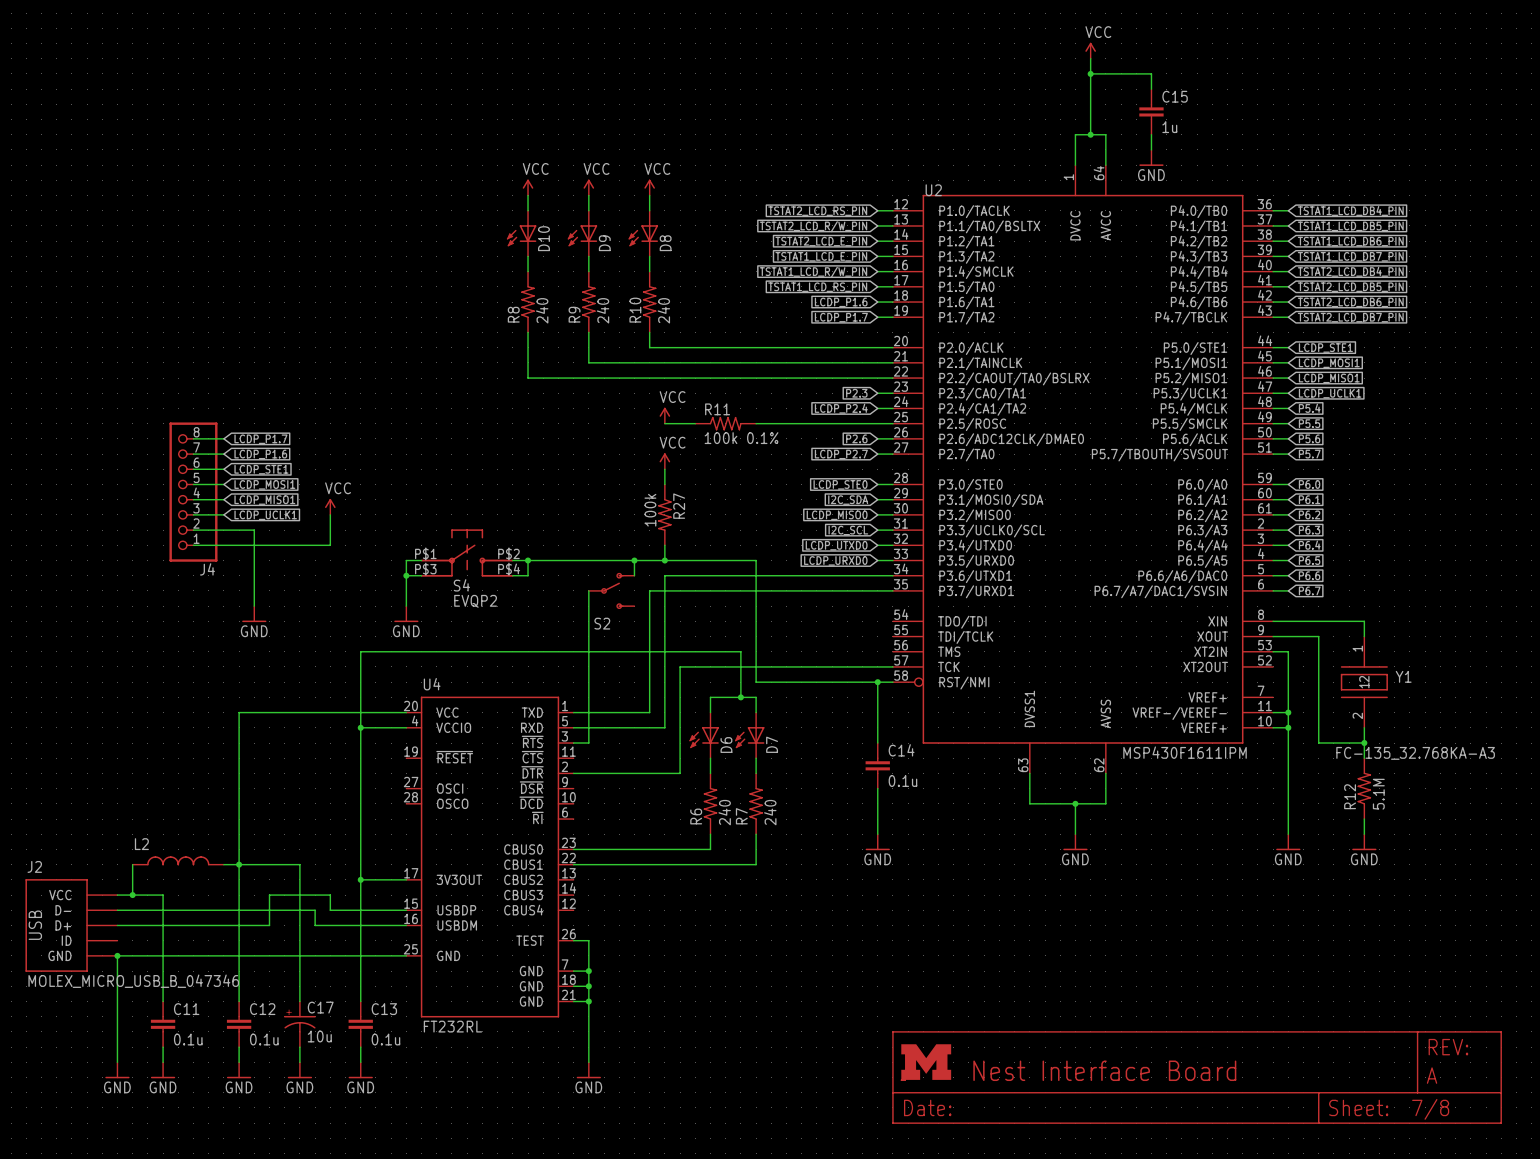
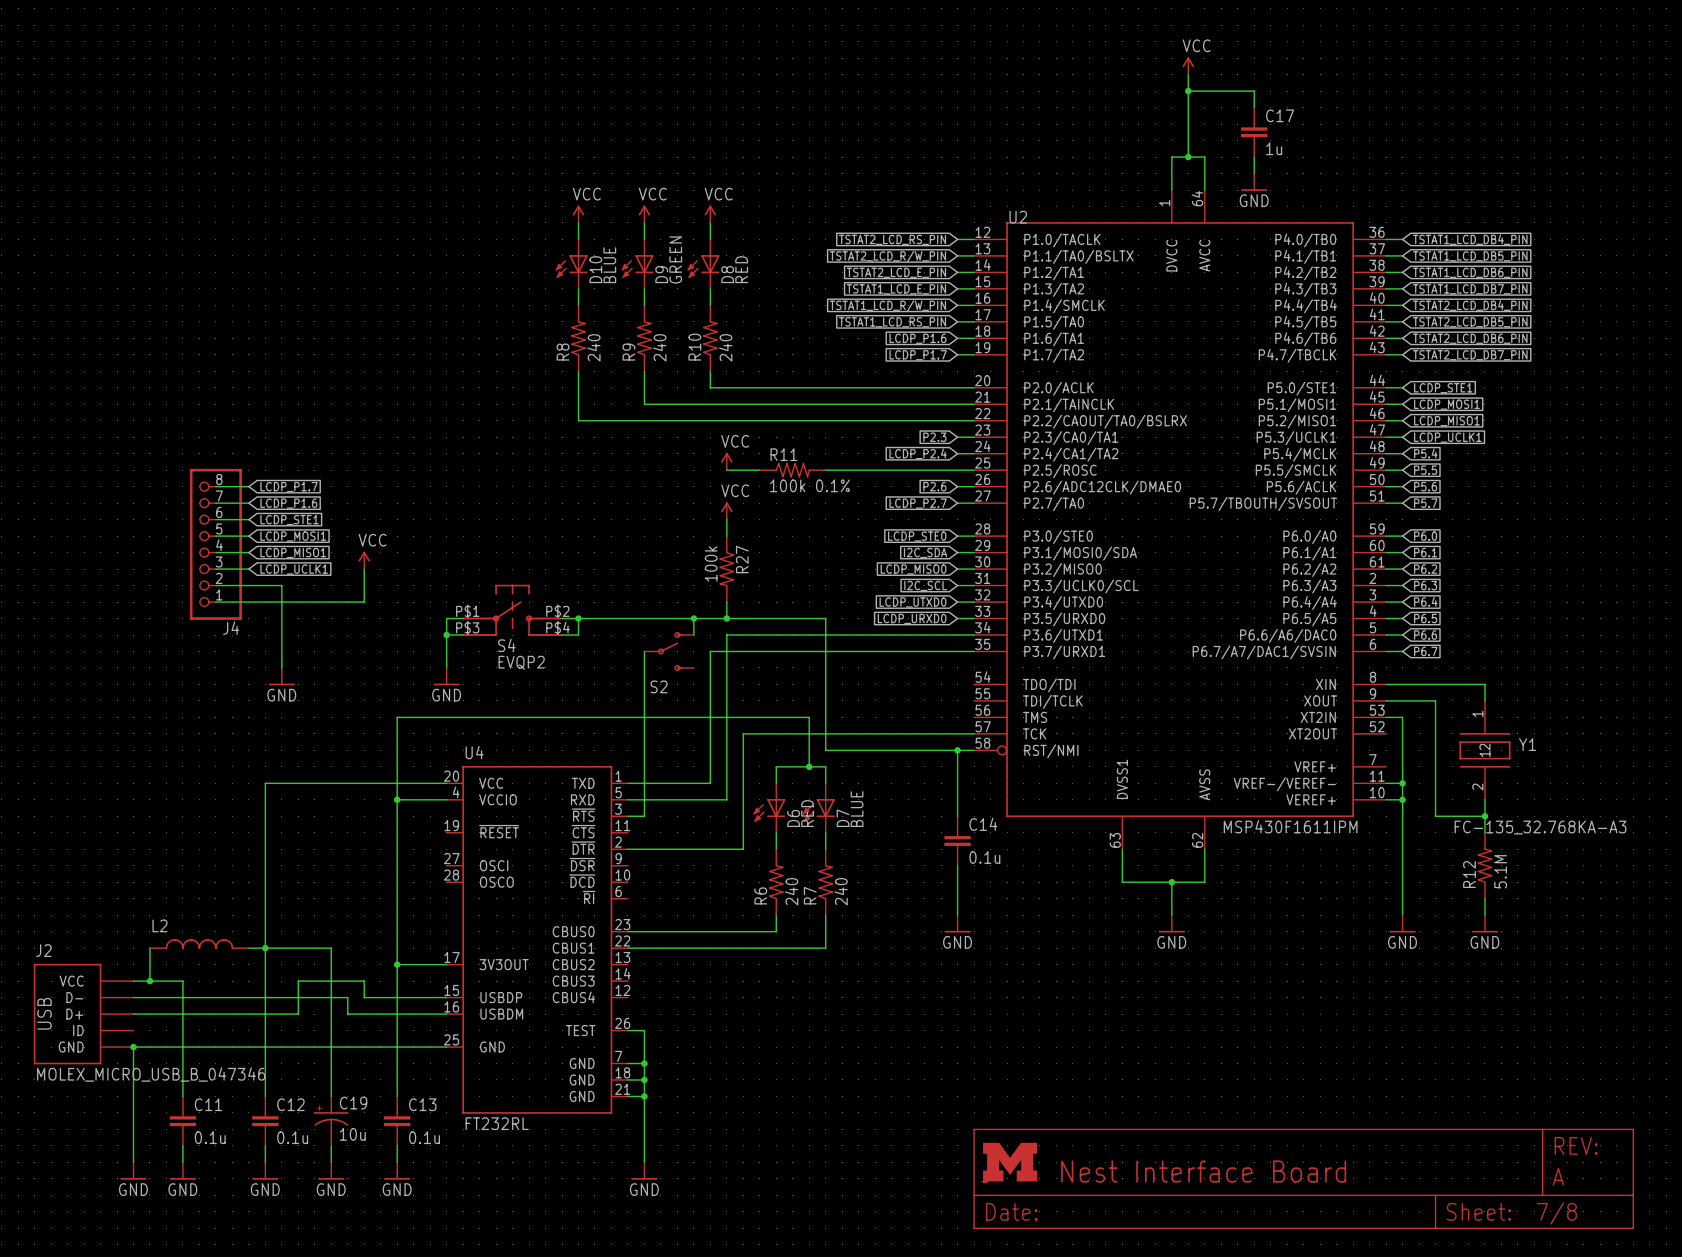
C15 name: C15 (1175, 96) -> C17 (1280, 115)
D9 value: none -> GREEN (675, 260)
D10 value: none -> BLUE (609, 265)
D8 value: none -> RED (741, 269)
D7 value: none -> BLUE (857, 809)
D6 value: none -> RED (807, 813)
C17 name: C17 (320, 1007) -> C19 (353, 1103)

